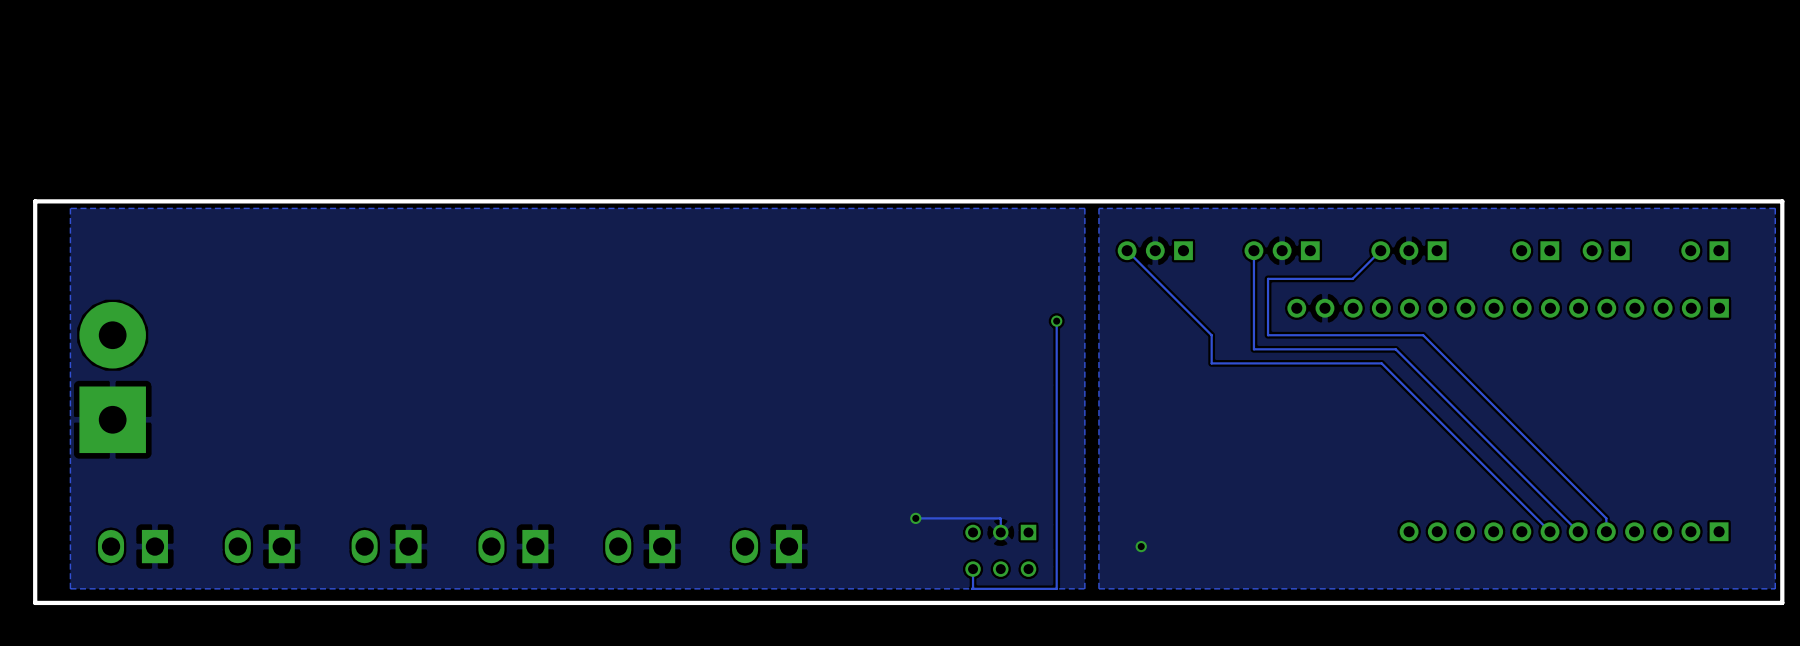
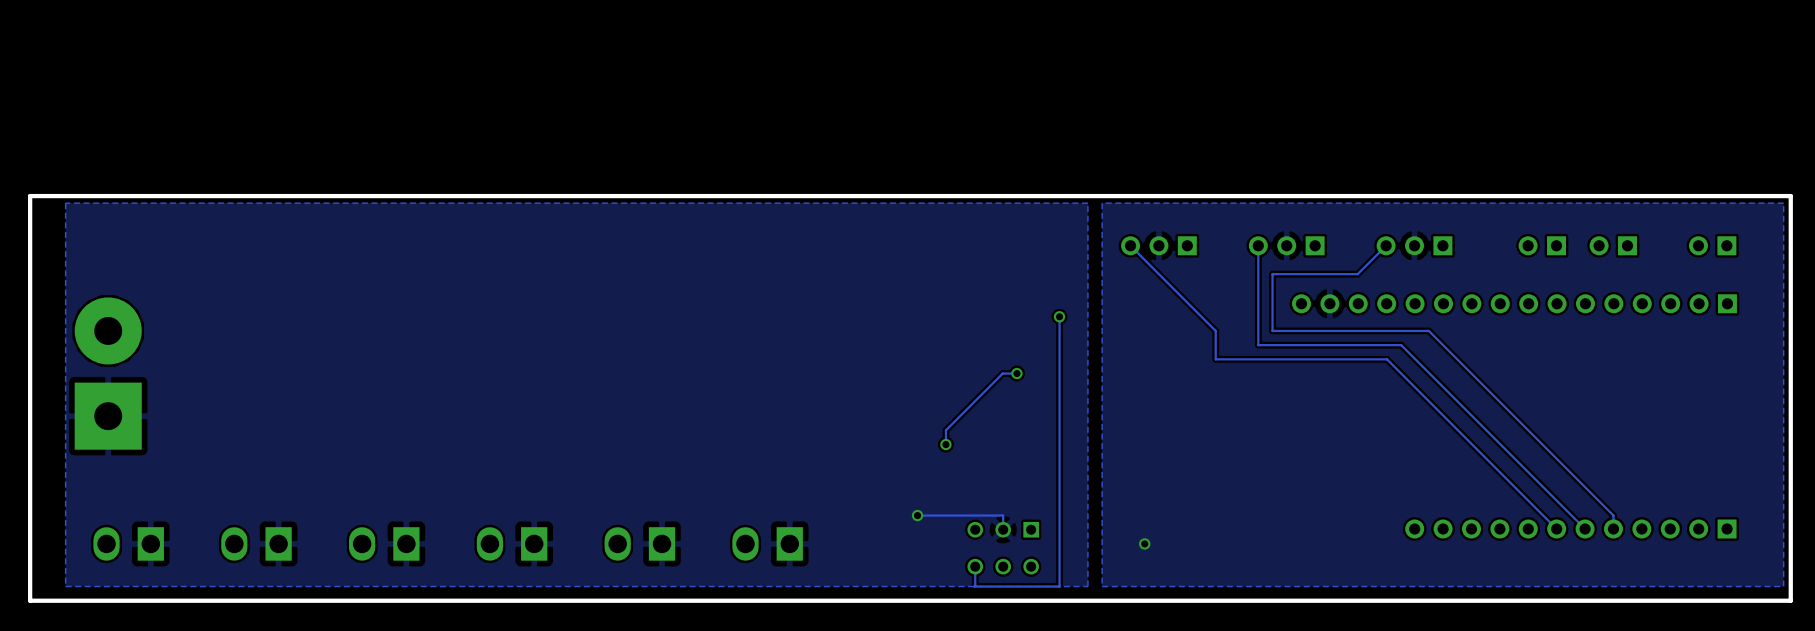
track: none -> (1016, 373) (1002, 373) (945, 430) (945, 444)
via: none -> (1016, 373)
via: none -> (945, 444)

